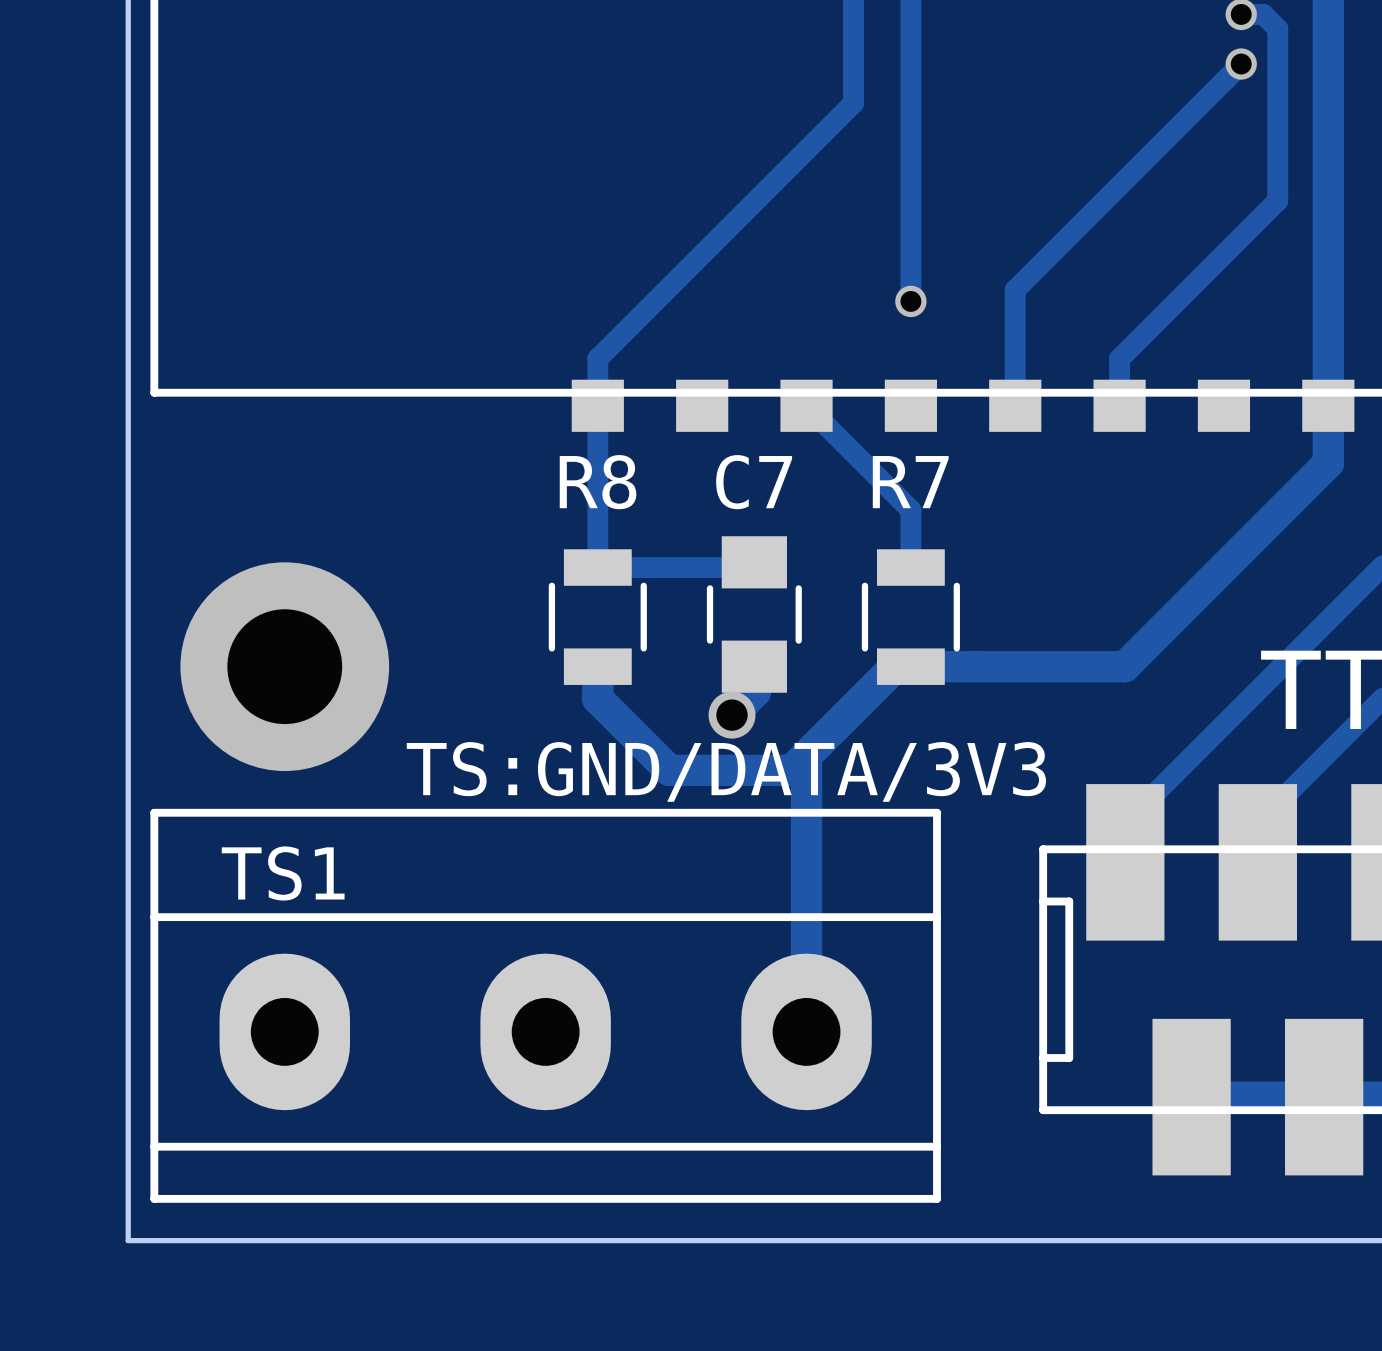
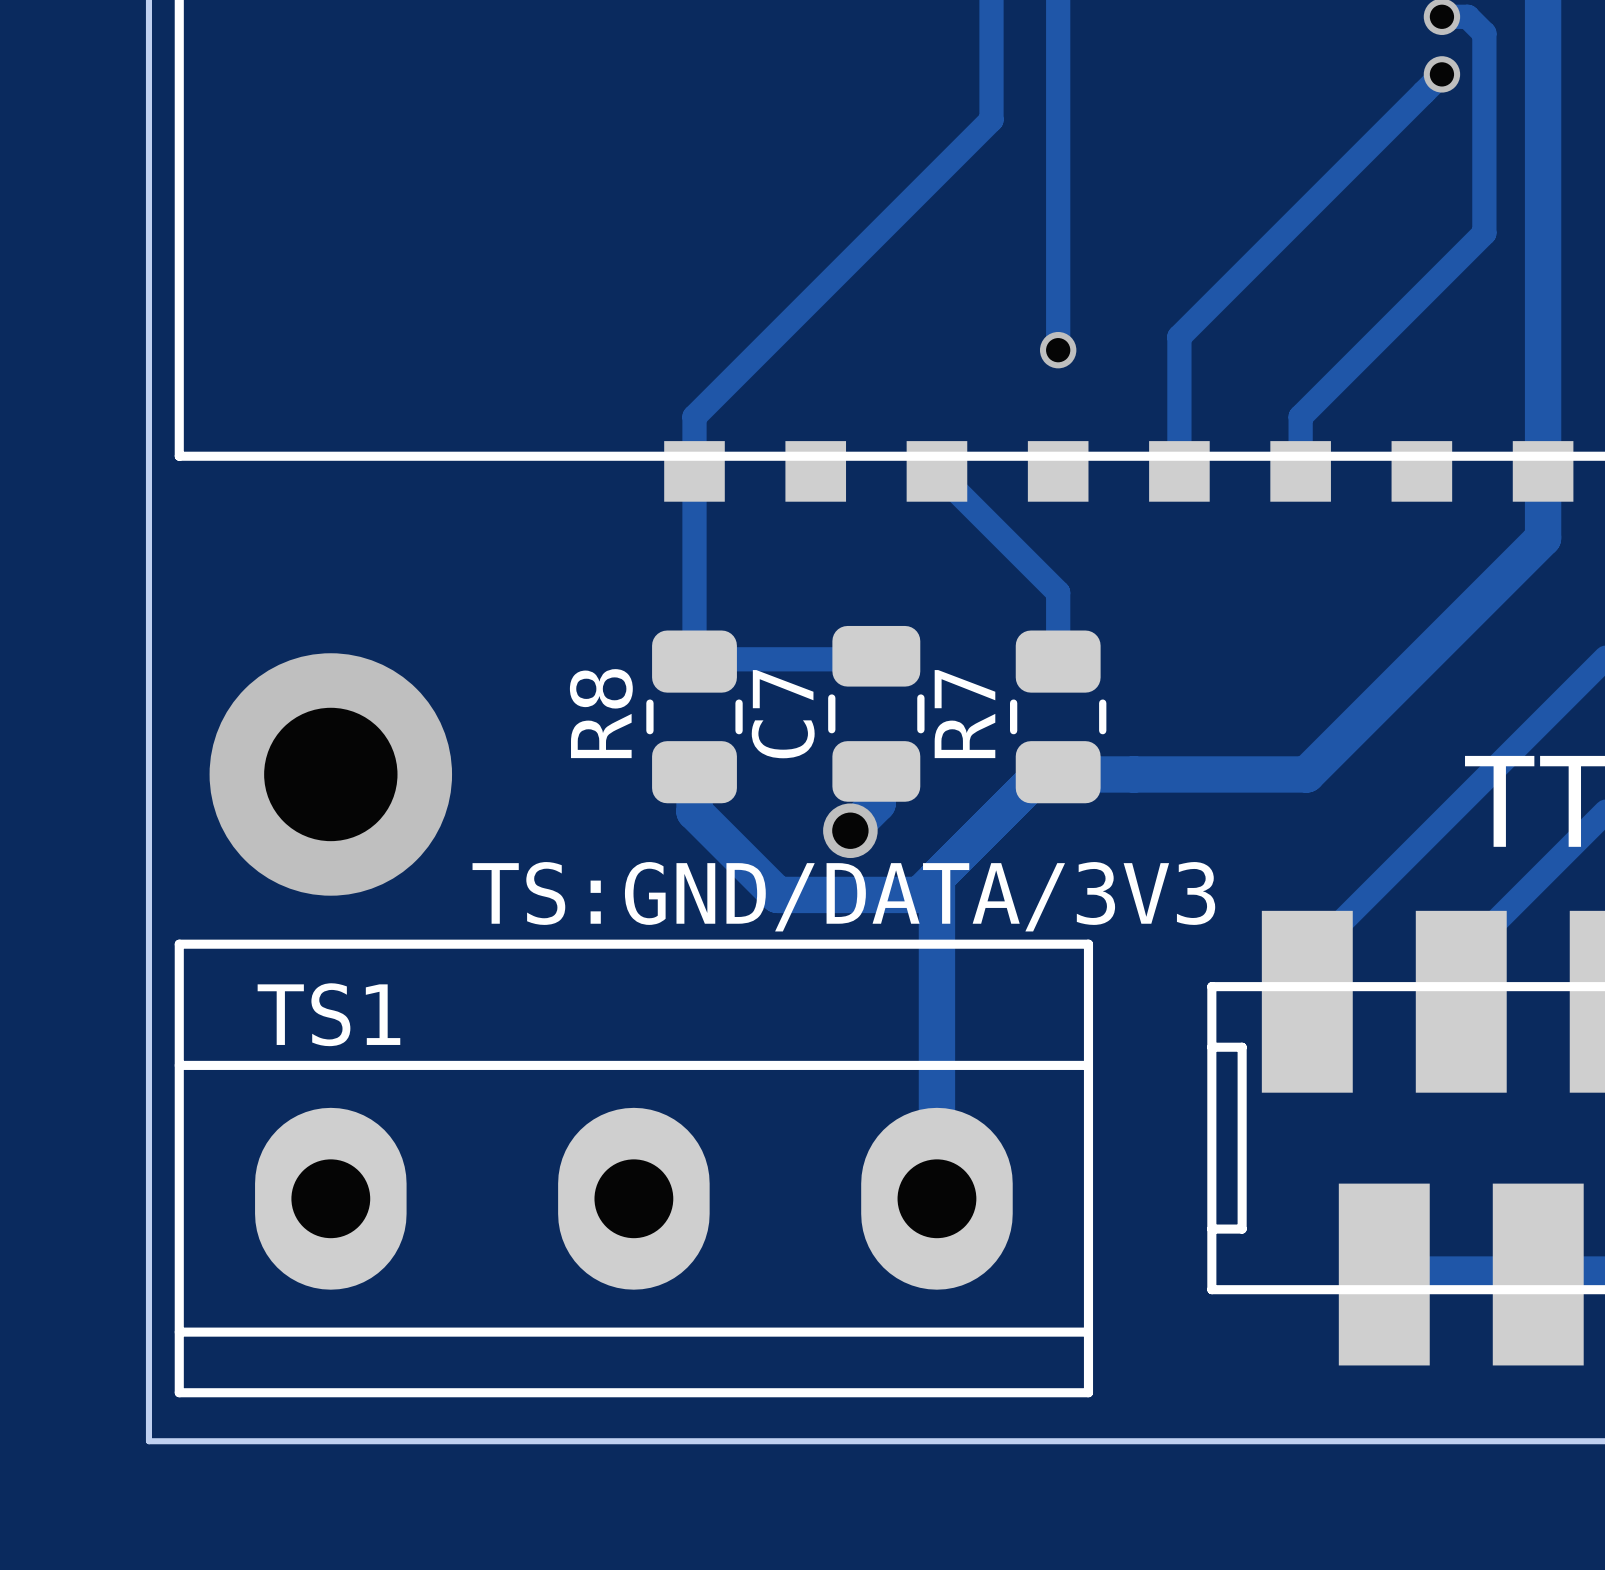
R8 name rotation: 0° (598, 482) -> 90° counterclockwise (601, 713)
R8 name position: R8 (598, 482) -> R8 (601, 713)
C7 name rotation: 0° (754, 482) -> 90° counterclockwise (783, 714)
C7 name position: C7 (754, 482) -> C7 (783, 714)
R7 name rotation: 0° (910, 482) -> 90° counterclockwise (964, 714)
R7 name position: R7 (910, 482) -> R7 (964, 714)
C7 footprint: [706, 536, 802, 693] -> [828, 625, 925, 802]
R8 footprint: [548, 549, 647, 685] -> [646, 630, 743, 804]
R7 footprint: [861, 549, 960, 685] -> [1009, 630, 1107, 804]

